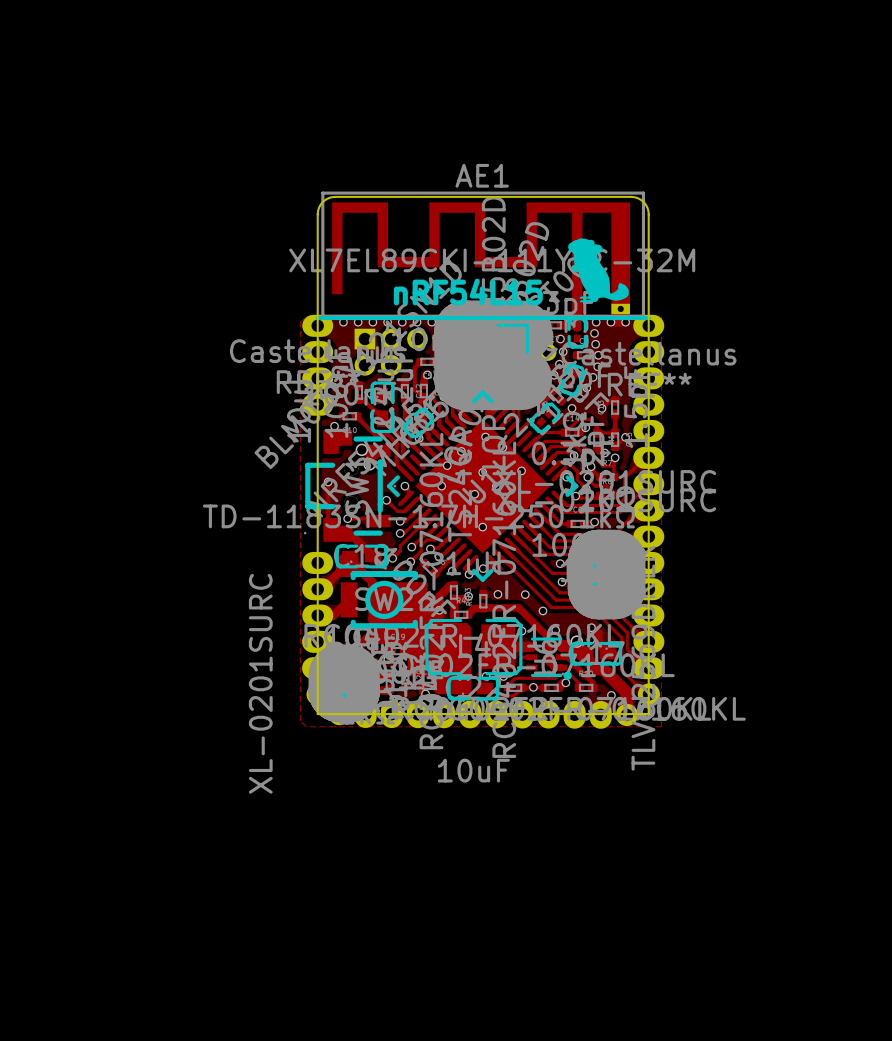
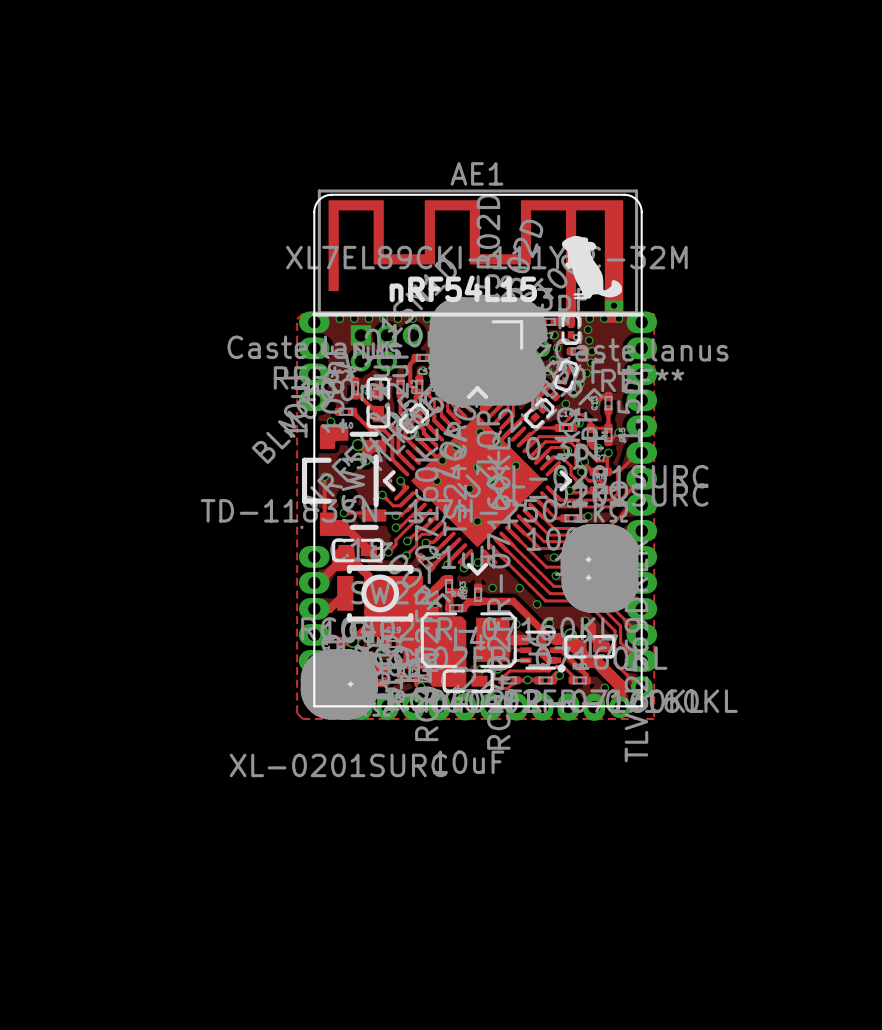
part rotation: 0° (344, 683) -> 90° counterclockwise (339, 684)

